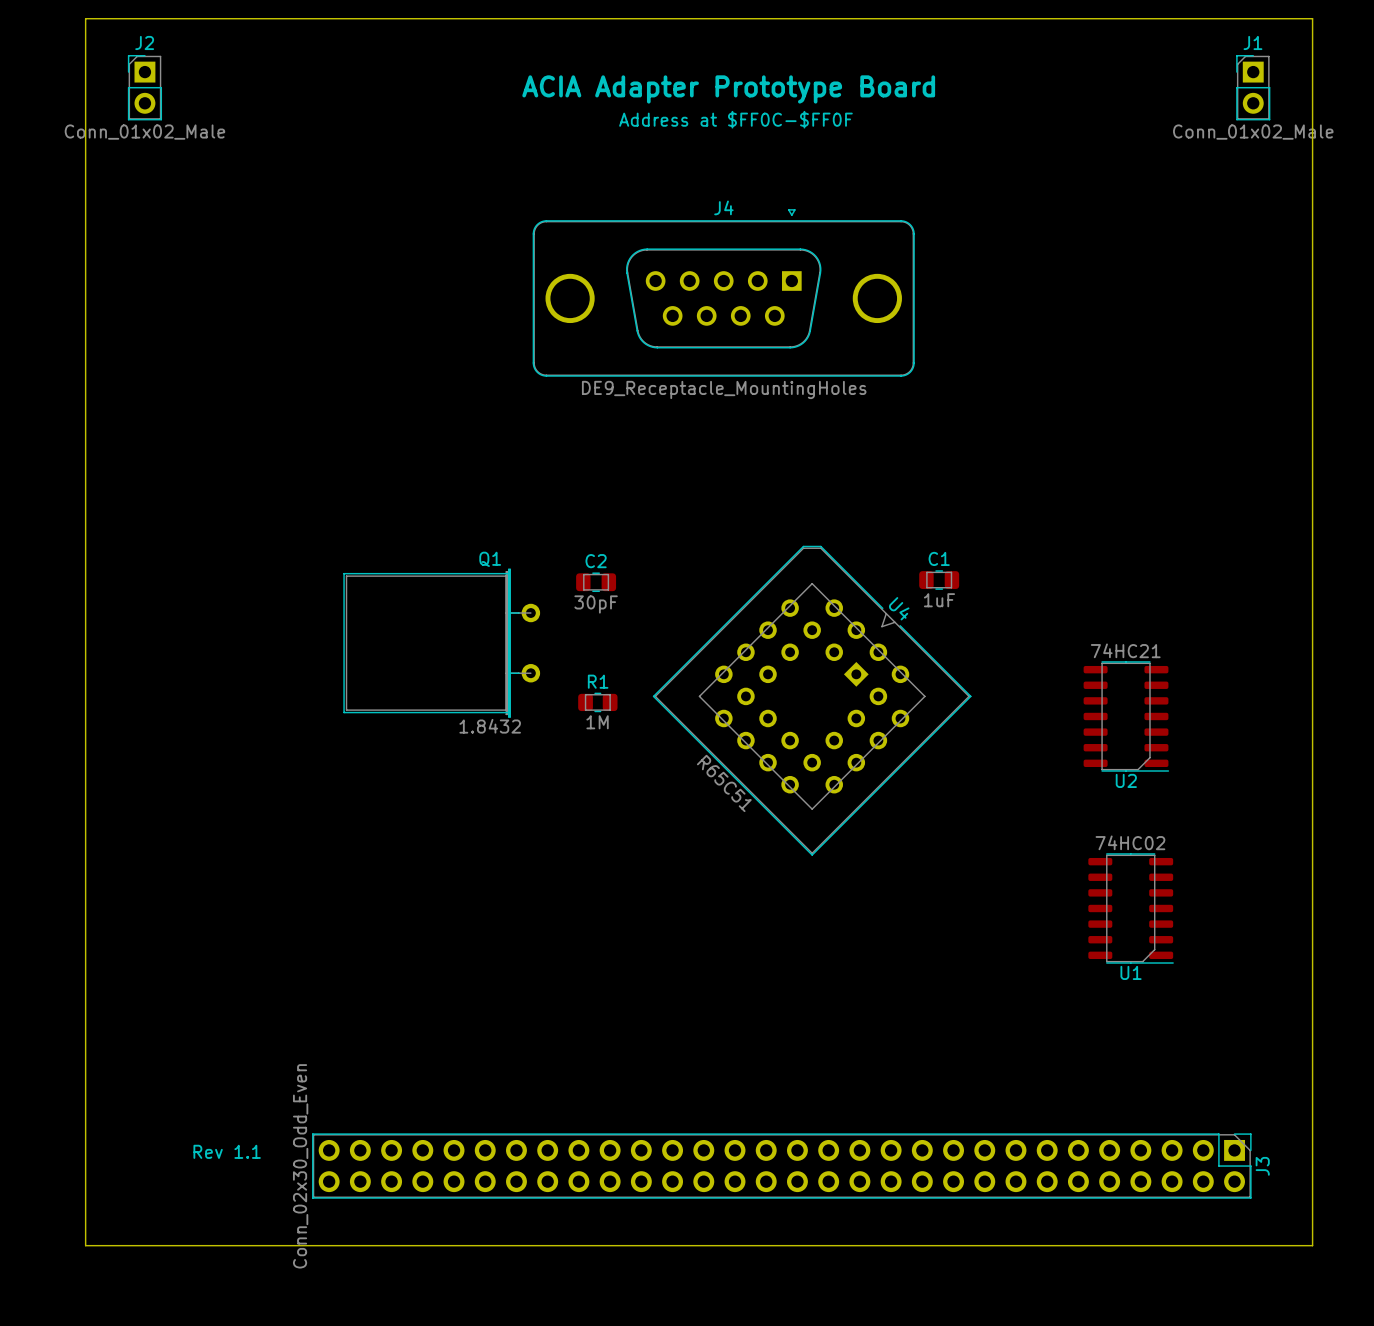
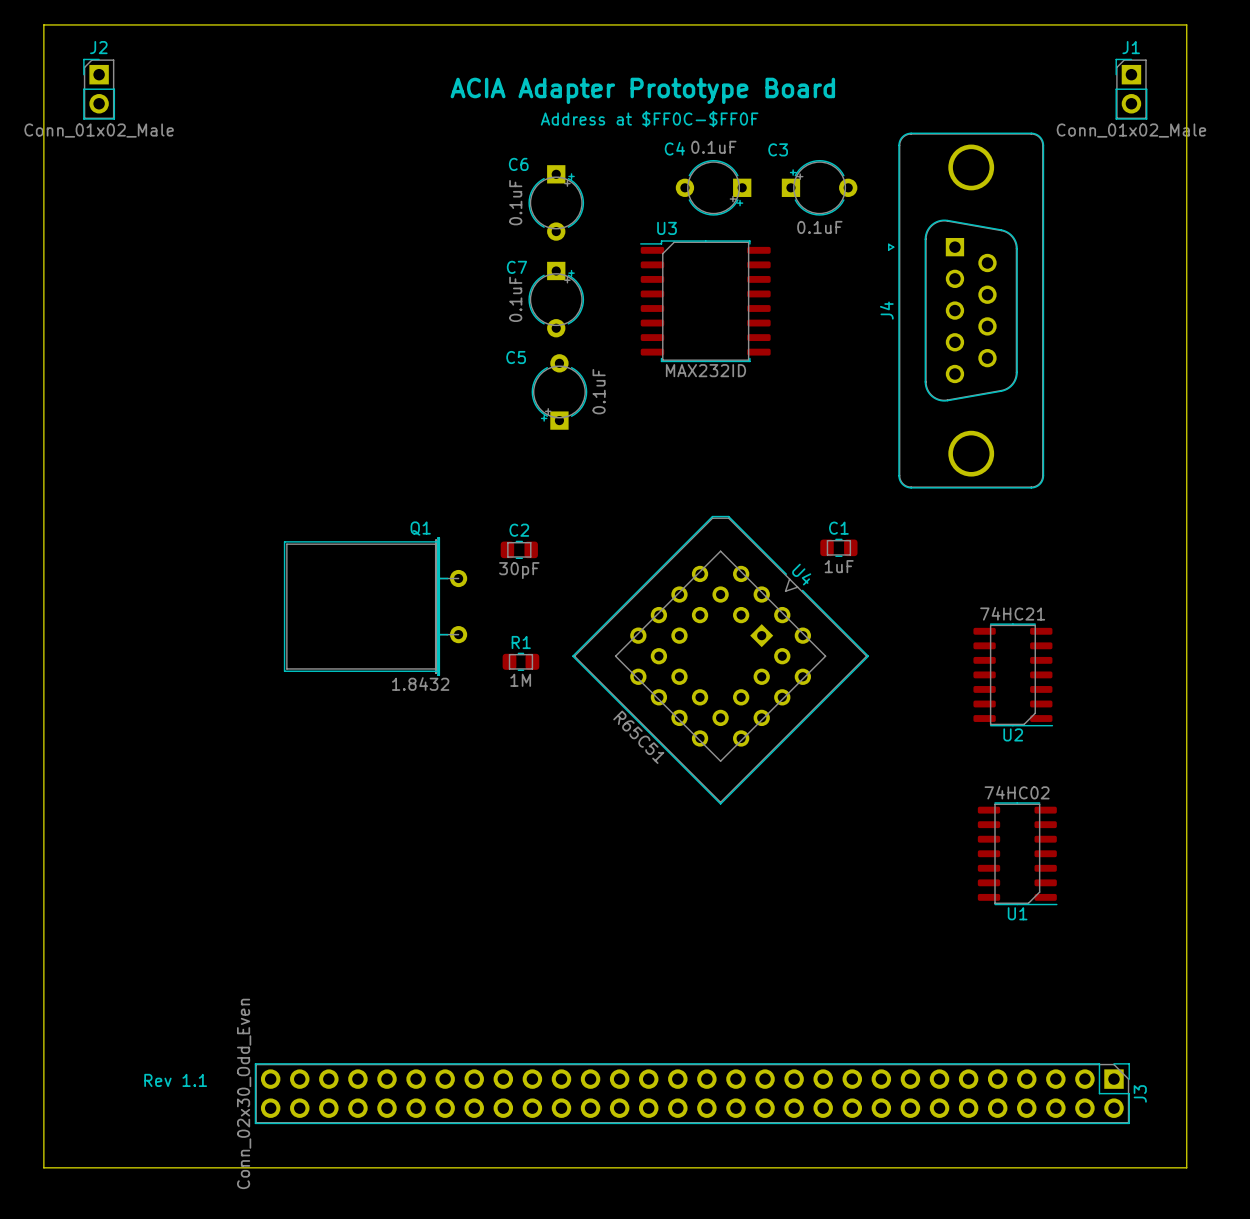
C4: none -> 0.1uF (713, 187)
C3: none -> 0.1uF (819, 187)
C6: none -> 0.1uF (556, 202)
J4 rotation: 0° (723, 292) -> 90° counterclockwise (966, 310)
J4 position: (723, 292) -> (966, 310)
C7: none -> 0.1uF (556, 299)
U3: none -> MAX232ID (705, 301)
J4 value: DE9_Receptacle_MountingHoles (724, 389) -> none
C5: none -> 0.1uF (559, 391)

